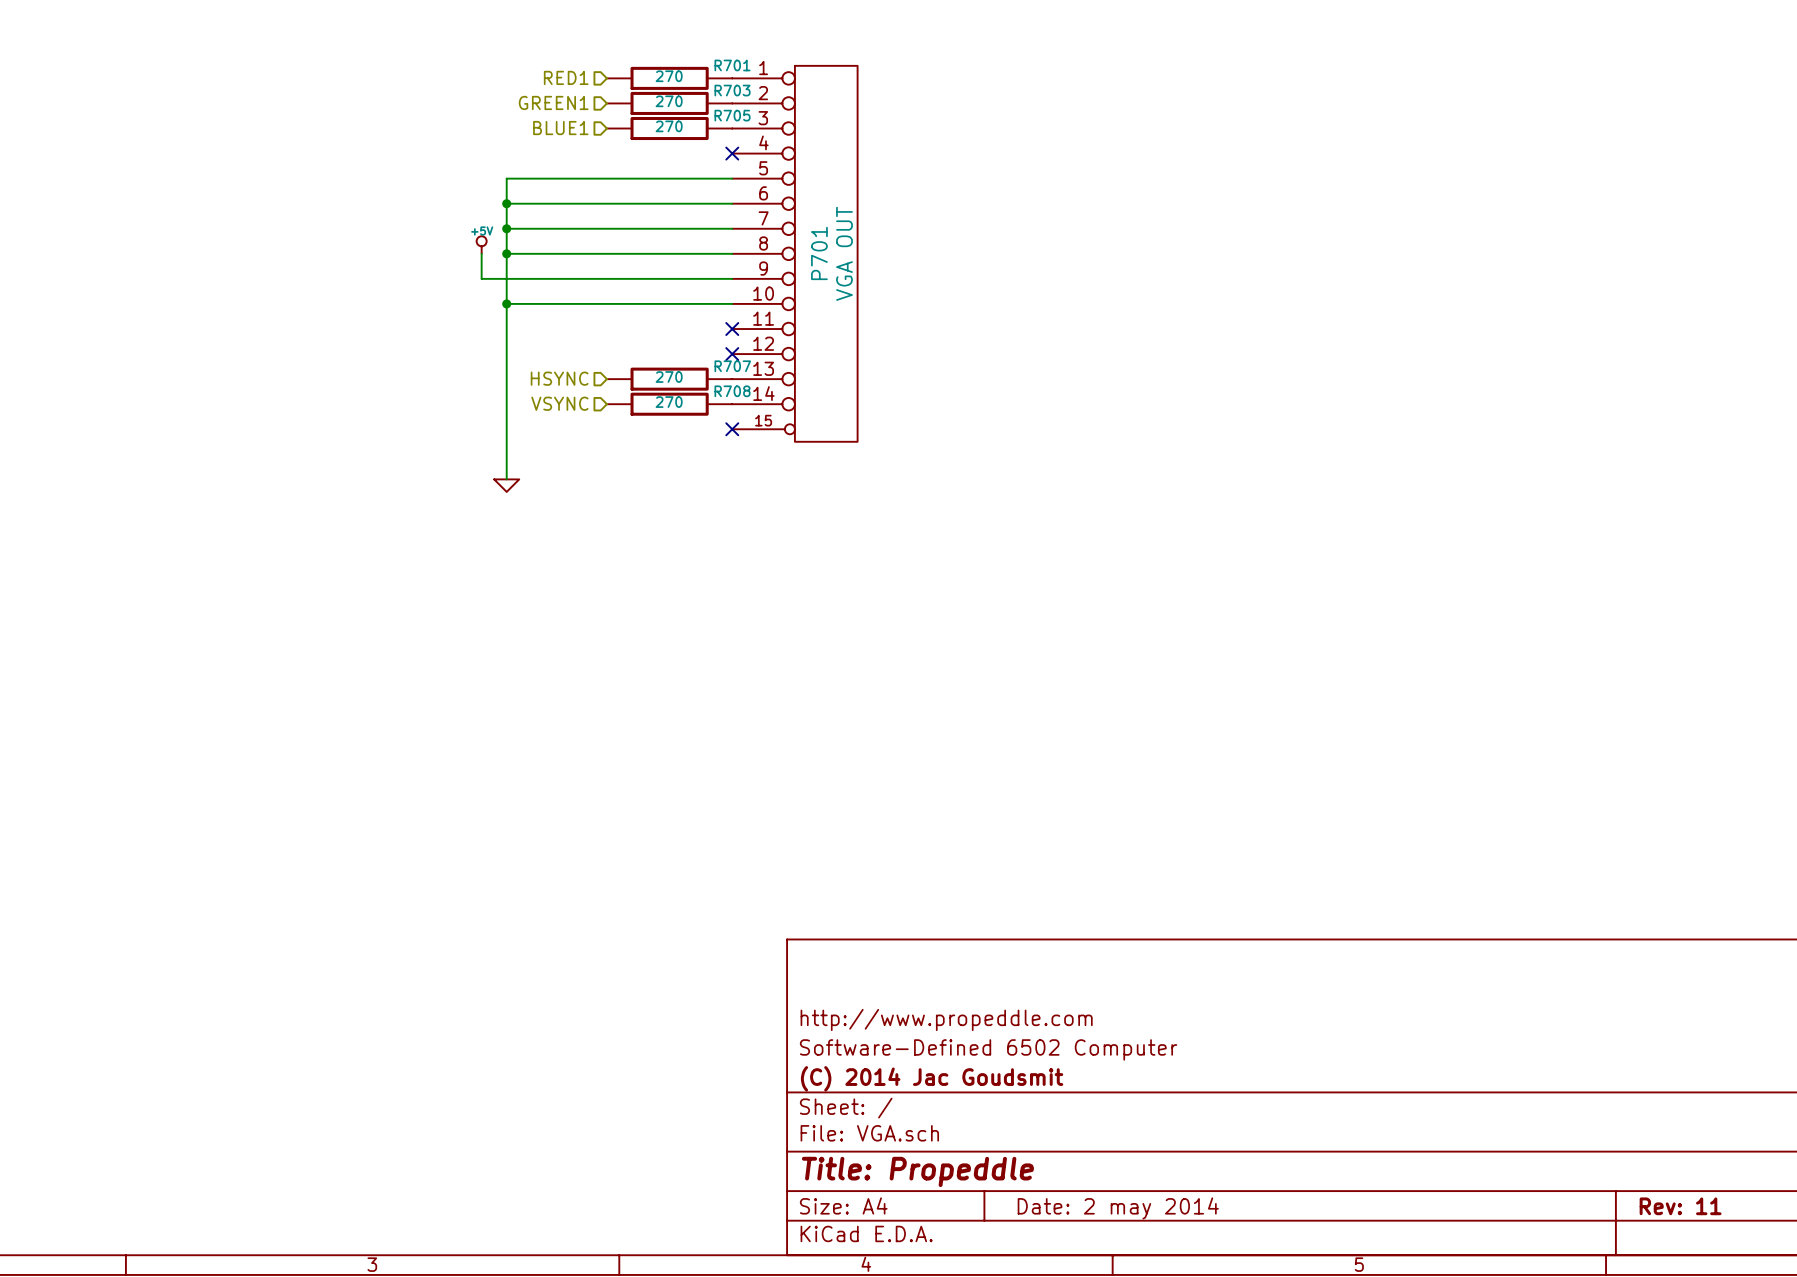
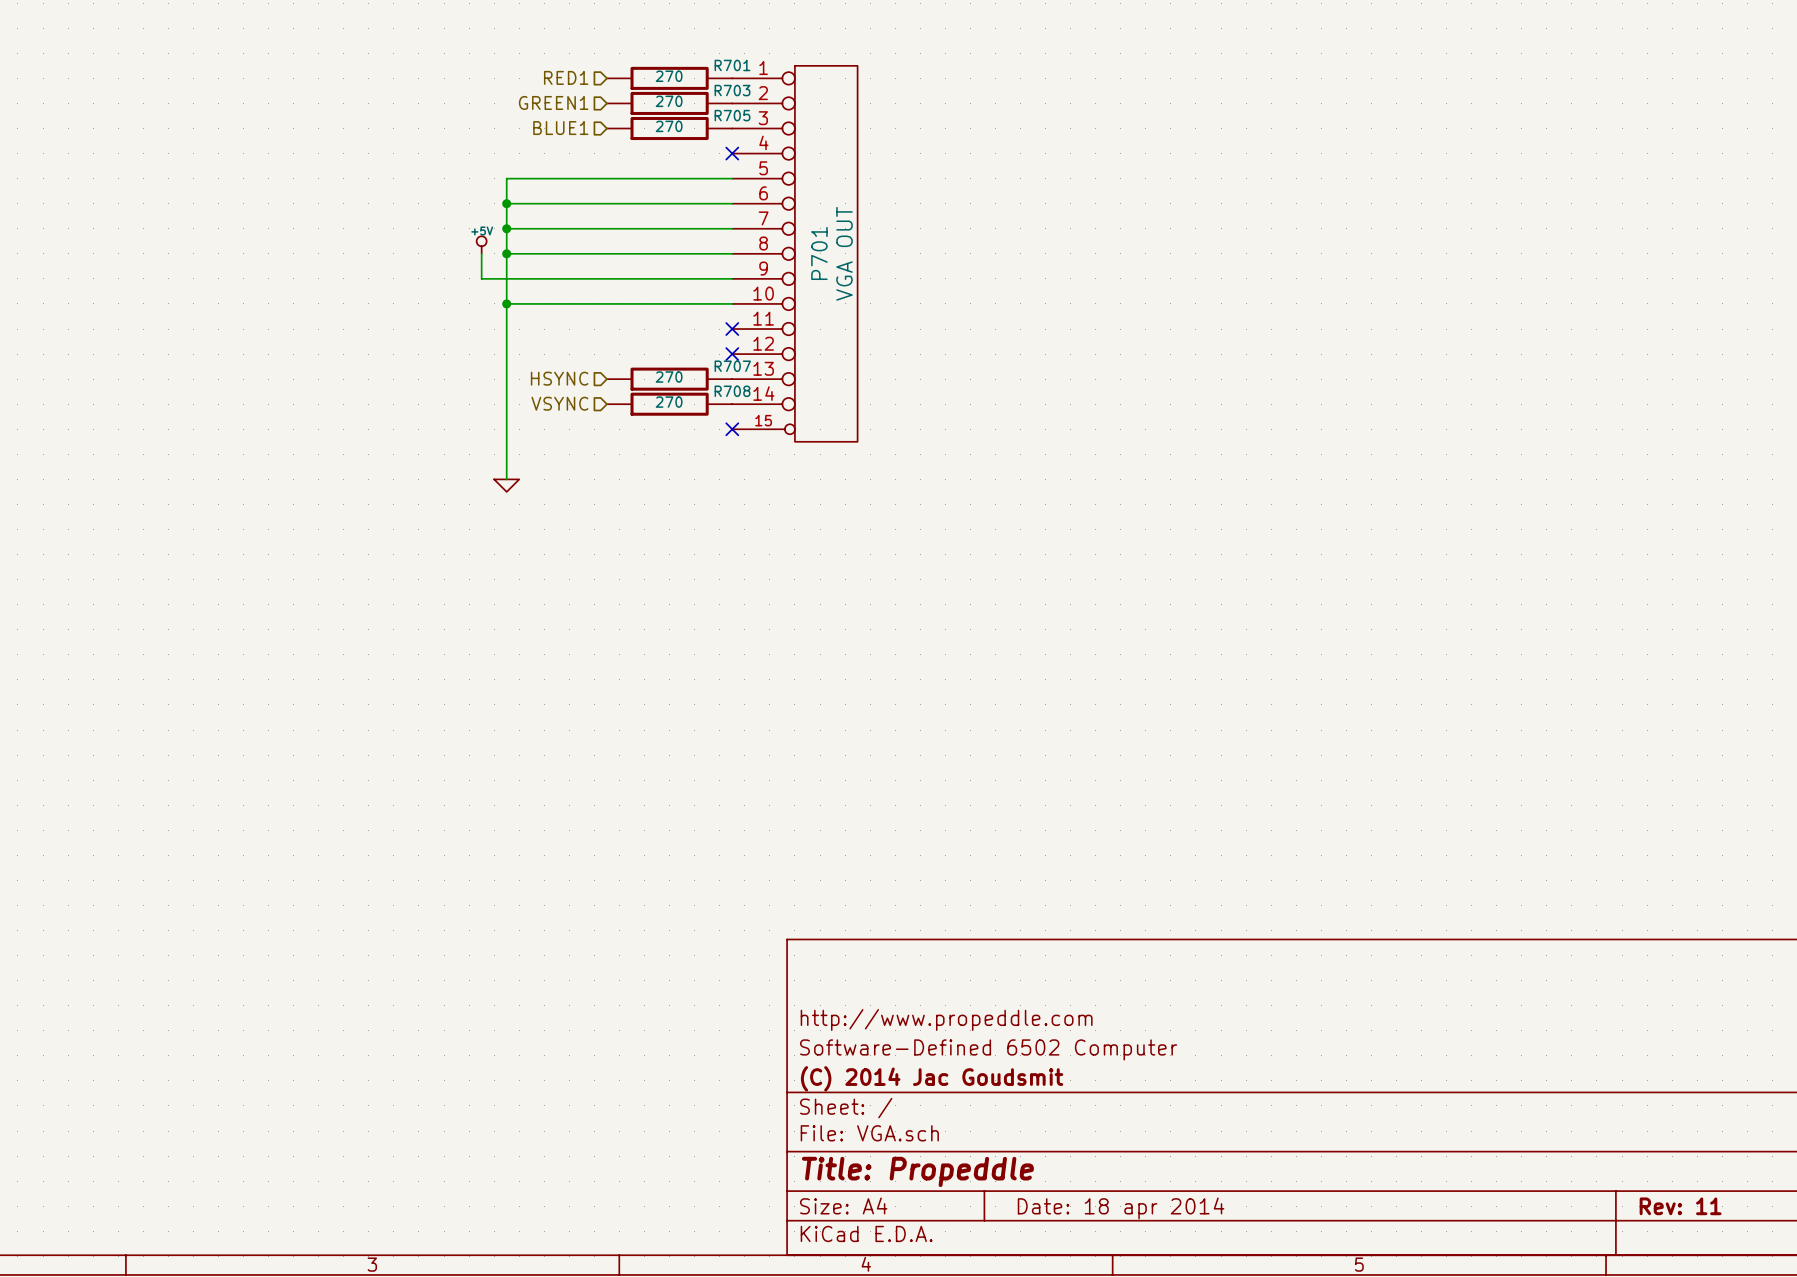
title block: Date: 2 may 2014 (1118, 1208) -> Date: 18 apr 2014 (1121, 1208)

